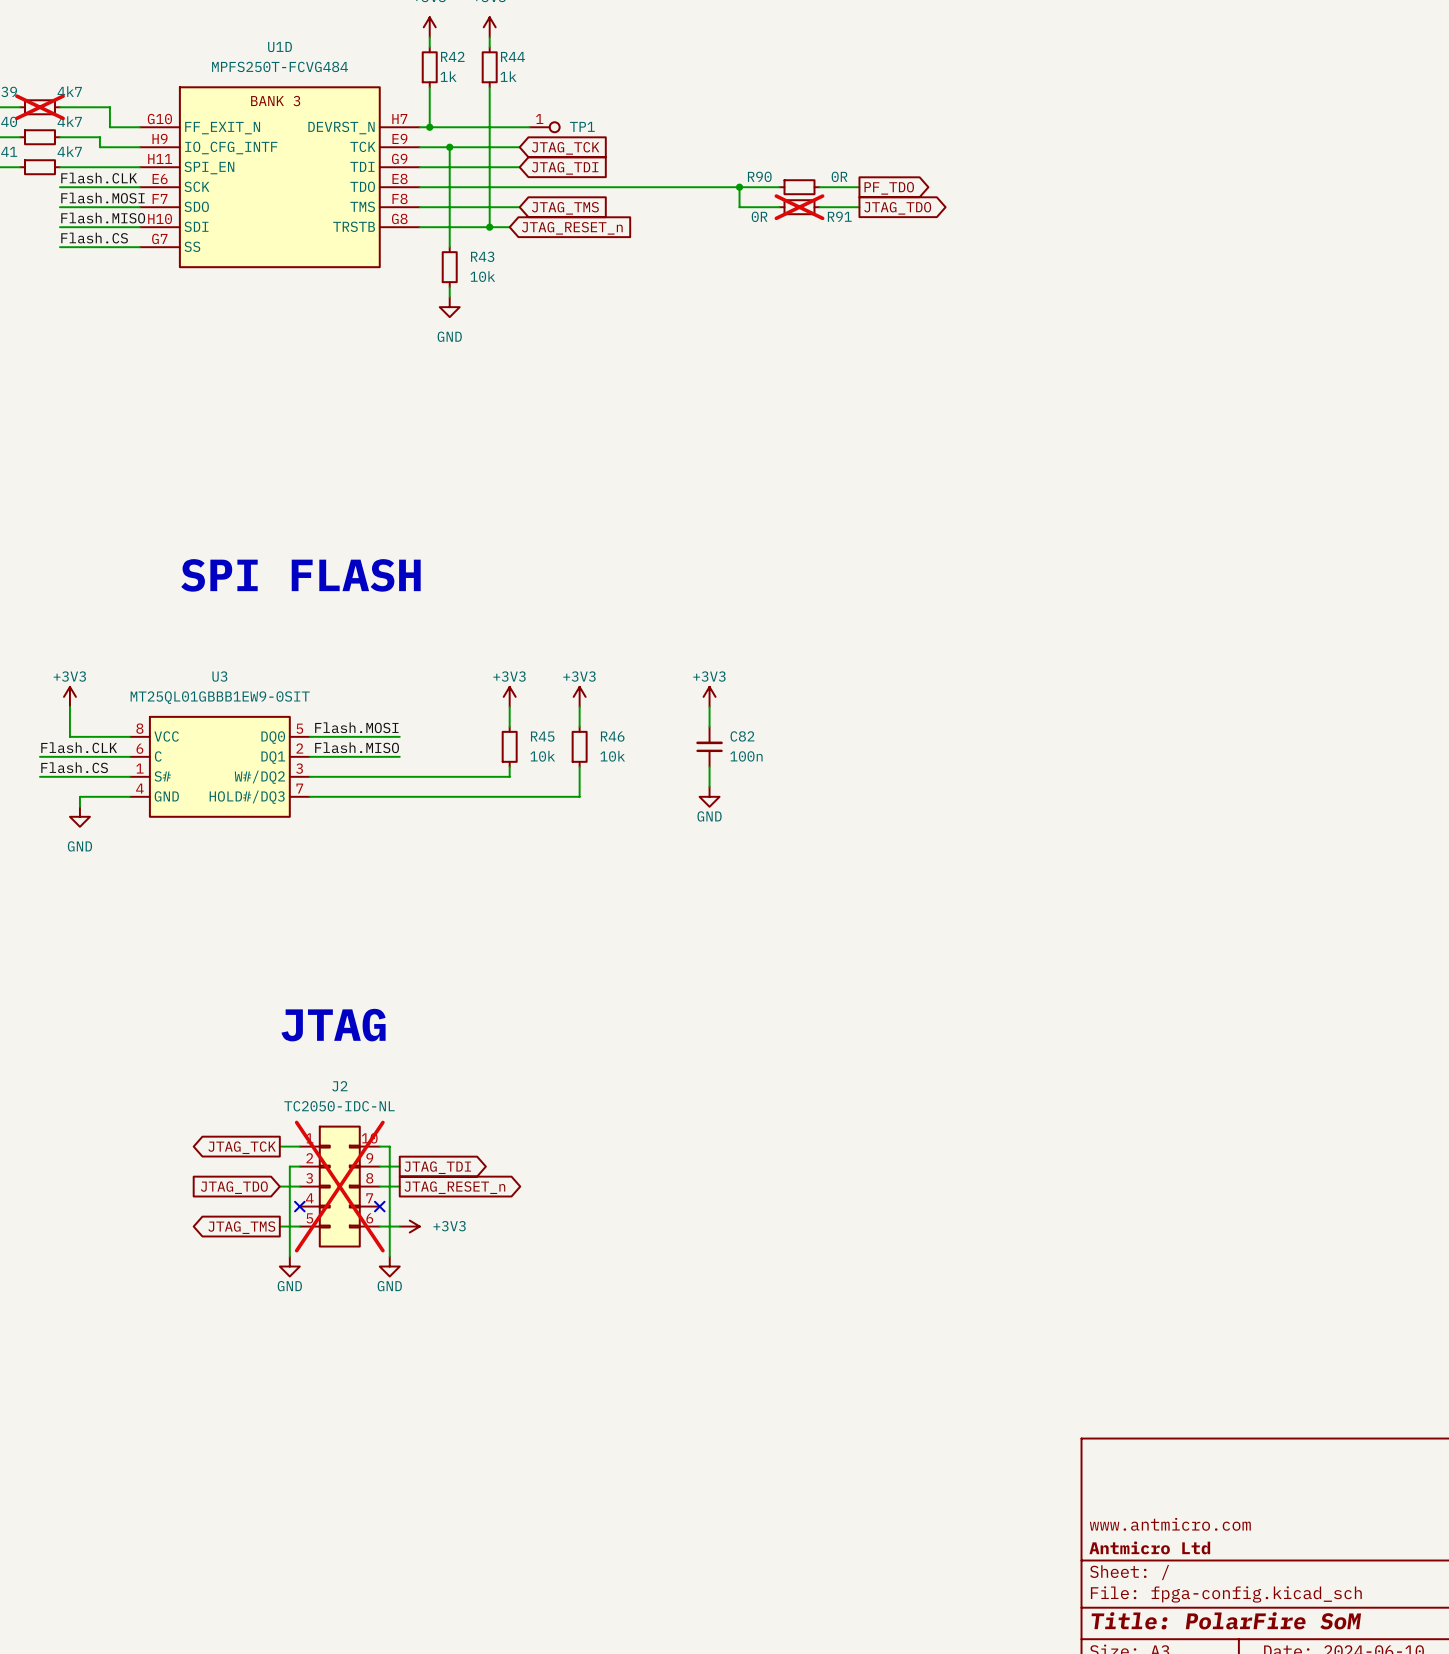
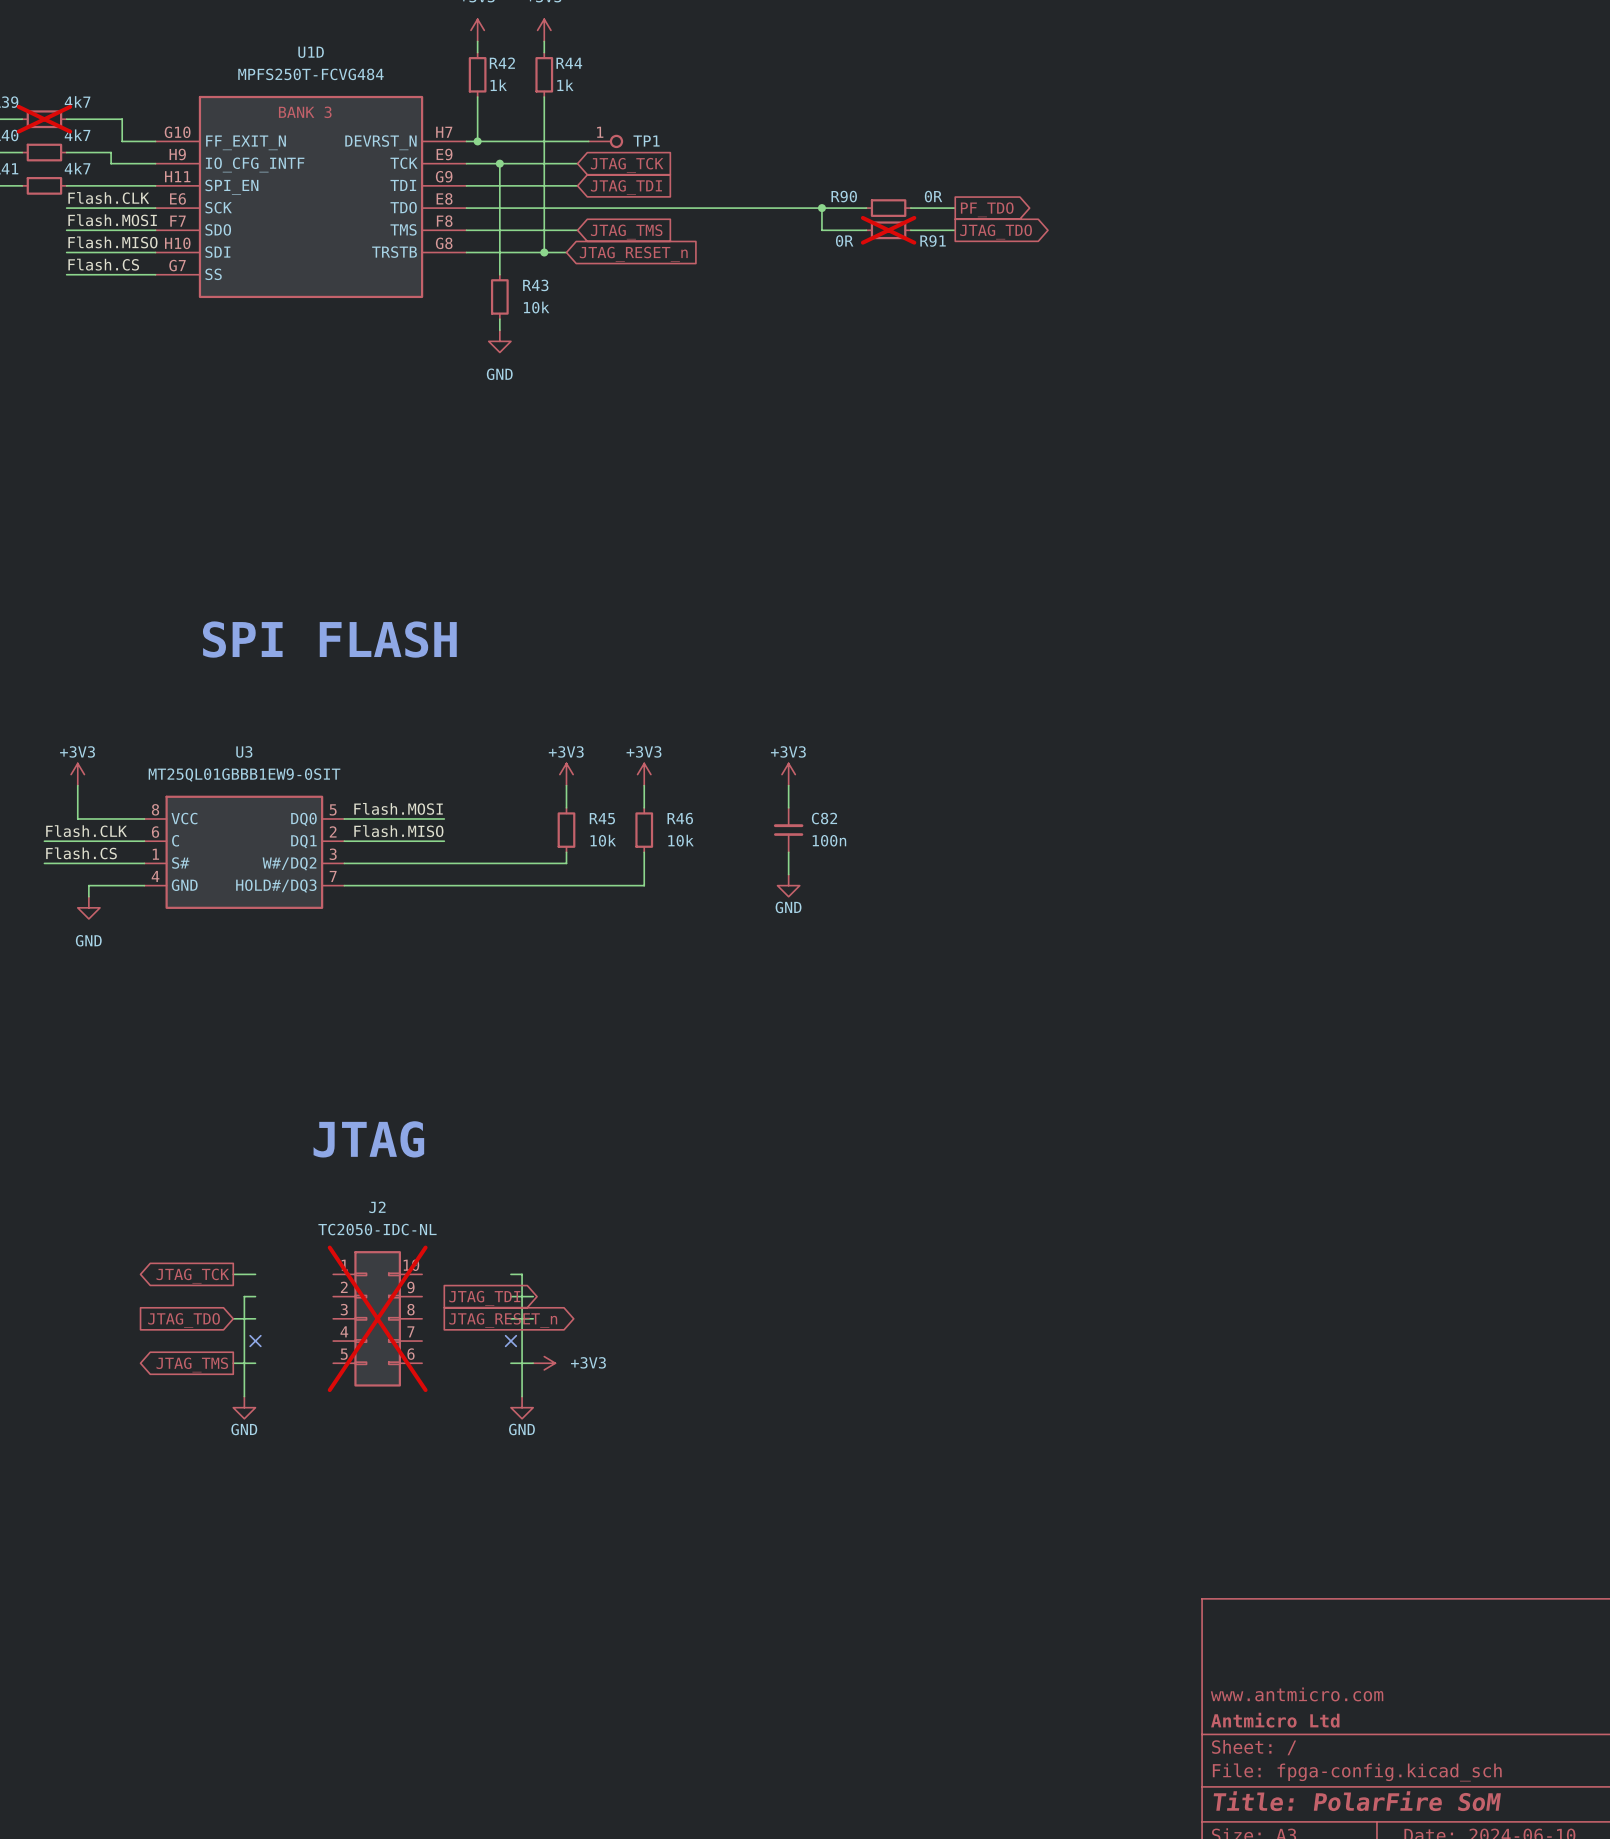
wire: (279, 1146) (299, 1146) -> (233, 1274) (255, 1274)
wire: (379, 1146) (389, 1146) (389, 1256) -> (510, 1274) (522, 1274) (522, 1396)
global label position: JTAG_TCK (242, 1147) -> JTAG_TCK (192, 1276)
wire: (299, 1166) (289, 1166) (289, 1256) -> (255, 1296) (244, 1296) (244, 1396)
wire: (379, 1166) (399, 1166) -> (510, 1296) (533, 1296)
wire: (279, 1186) (299, 1186) -> (233, 1318) (255, 1318)
wire: (379, 1186) (399, 1186) -> (510, 1318) (533, 1318)
global label position: JTAG_TDO (234, 1187) -> JTAG_TDO (184, 1320)
no-connect mark: none -> (255, 1341)
no-connect mark: (299, 1206) -> none
no-connect mark: (379, 1206) -> none
no-connect mark: none -> (510, 1341)
wire: (279, 1226) (299, 1226) -> (233, 1363) (255, 1363)
wire: (379, 1226) (399, 1226) -> (510, 1363) (533, 1363)
power symbol position: +3V3 (409, 1226) -> +3V3 (544, 1363)
global label position: JTAG_TMS (241, 1227) -> JTAG_TMS (192, 1364)
power symbol position: GND (289, 1266) -> GND (244, 1407)
power symbol position: GND (389, 1266) -> GND (522, 1407)

